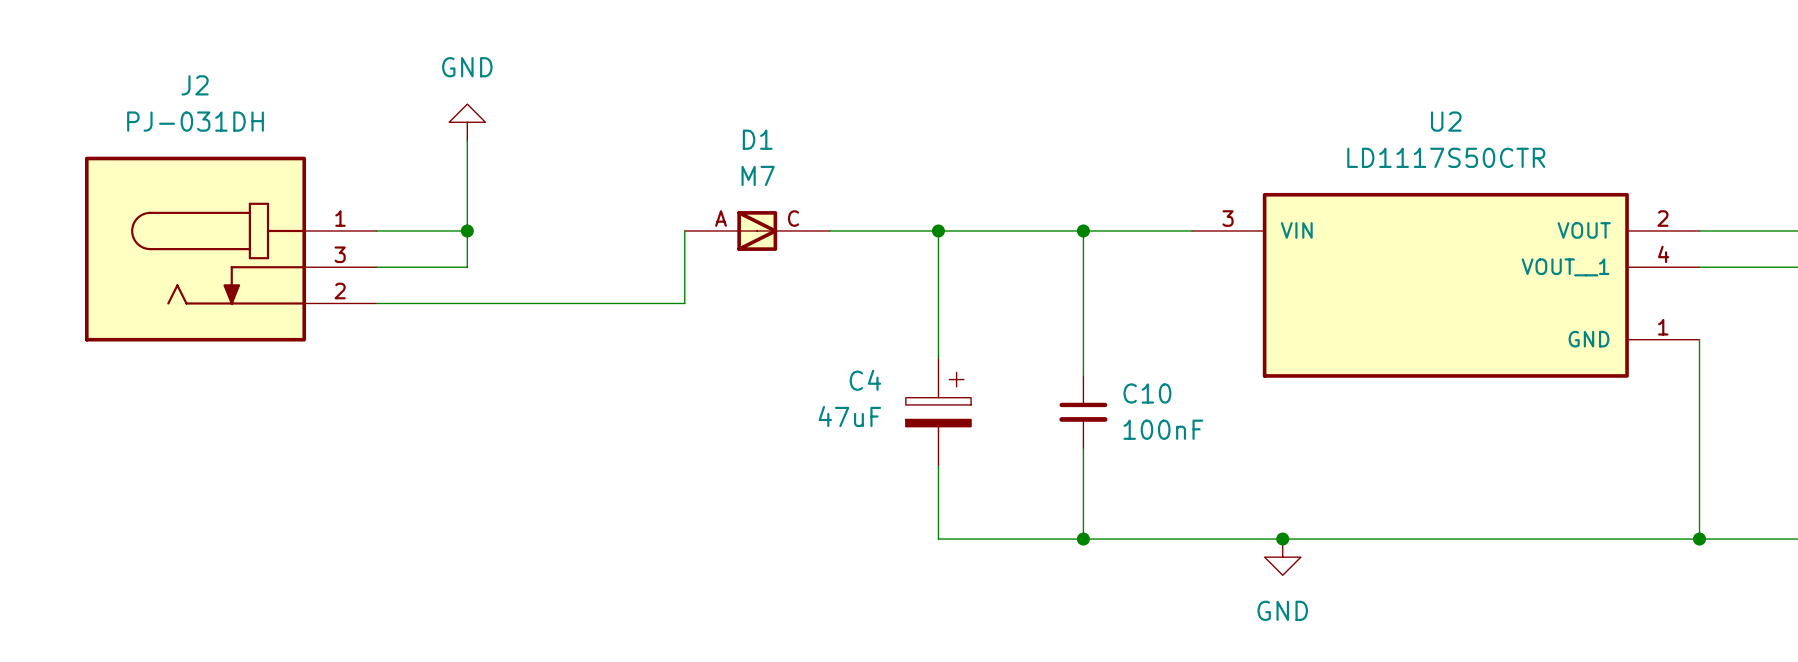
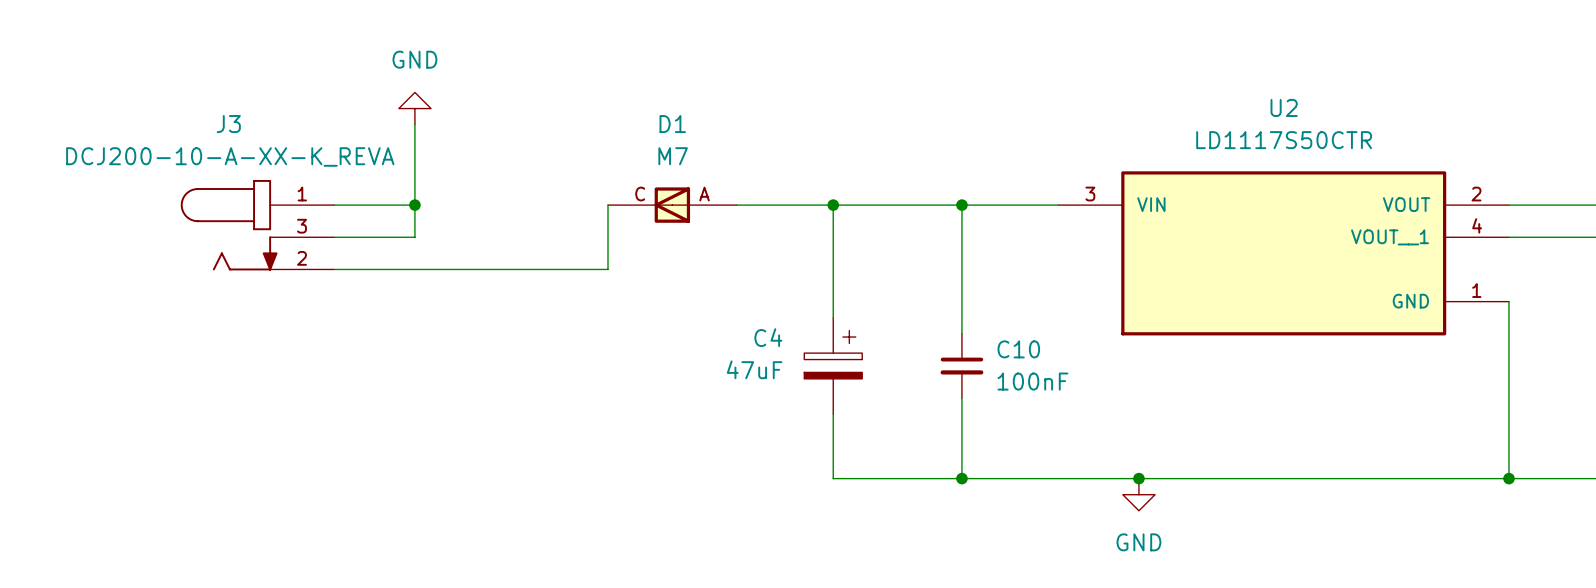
D1 rotation: 0° (757, 230) -> 180° (672, 205)
J2: PJ-031DH (230, 249) -> none
J3: none -> DCJ200-10-A-XX-K_REVA (257, 225)

